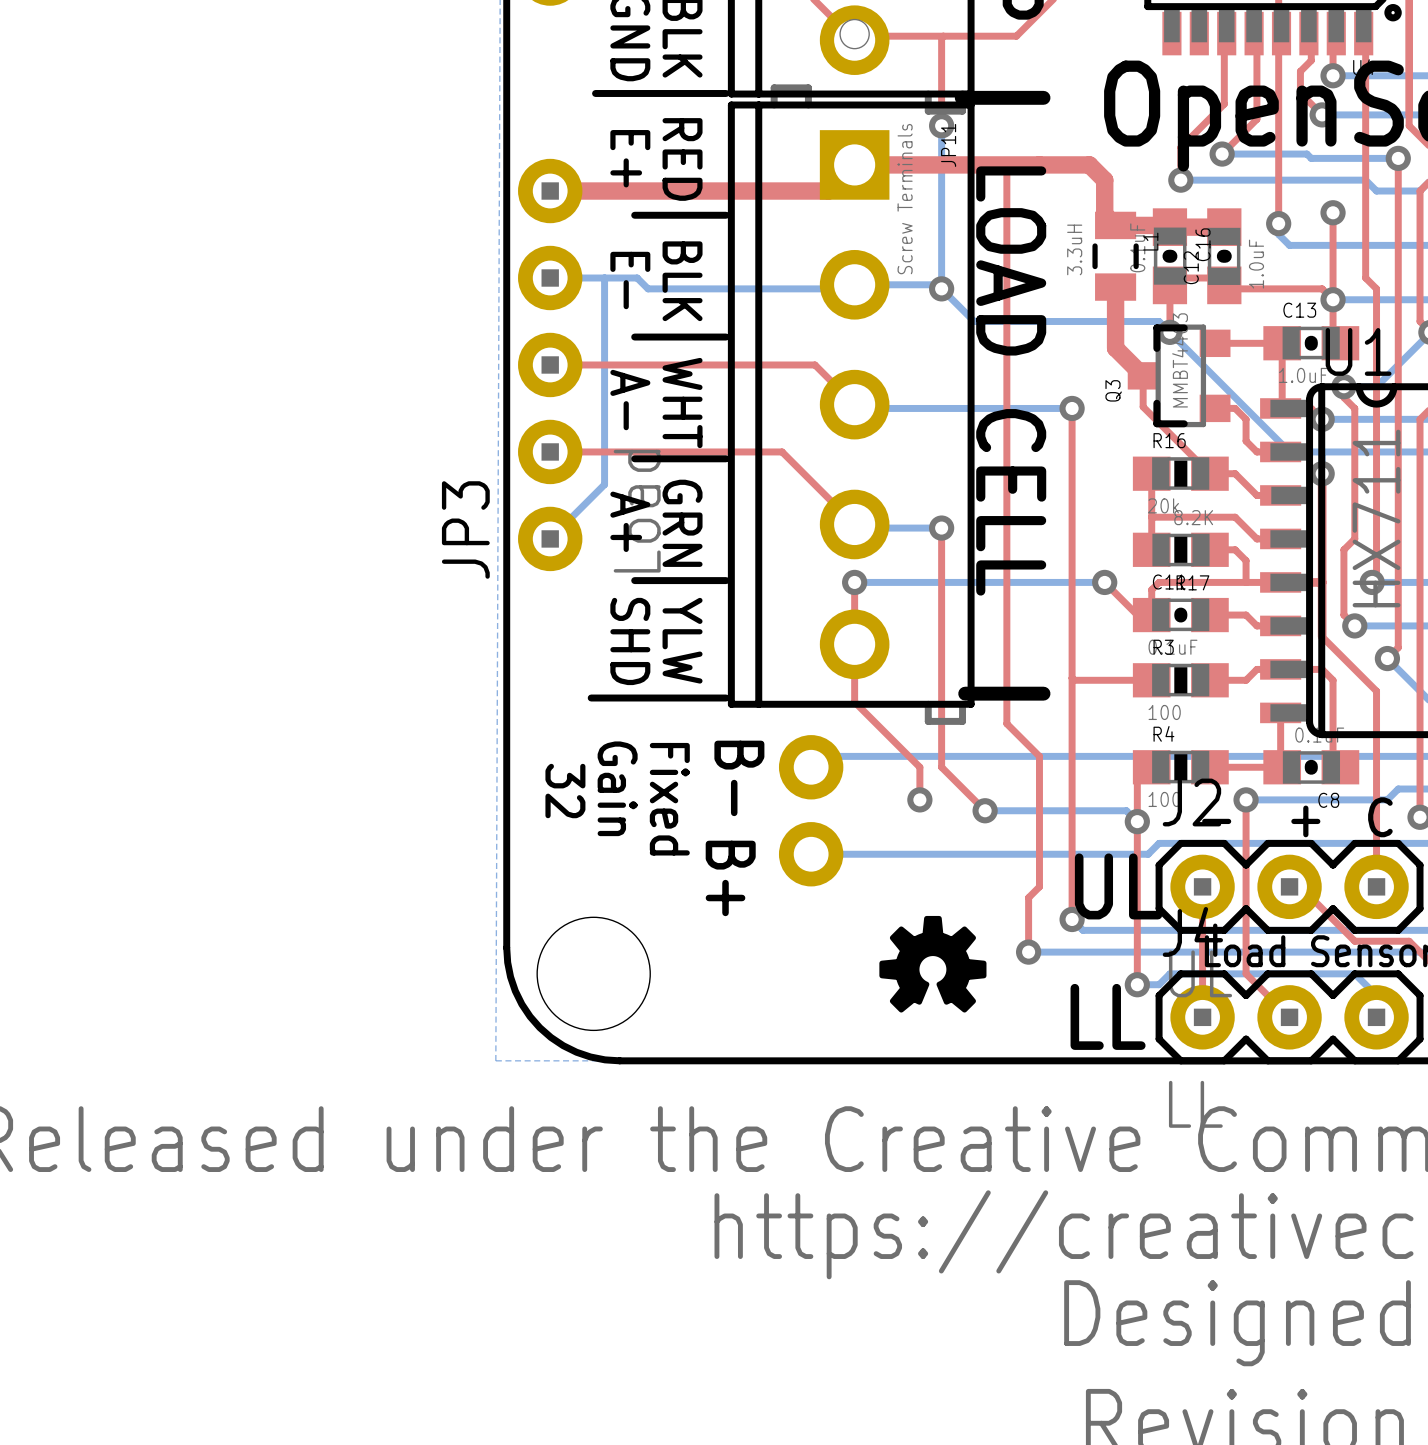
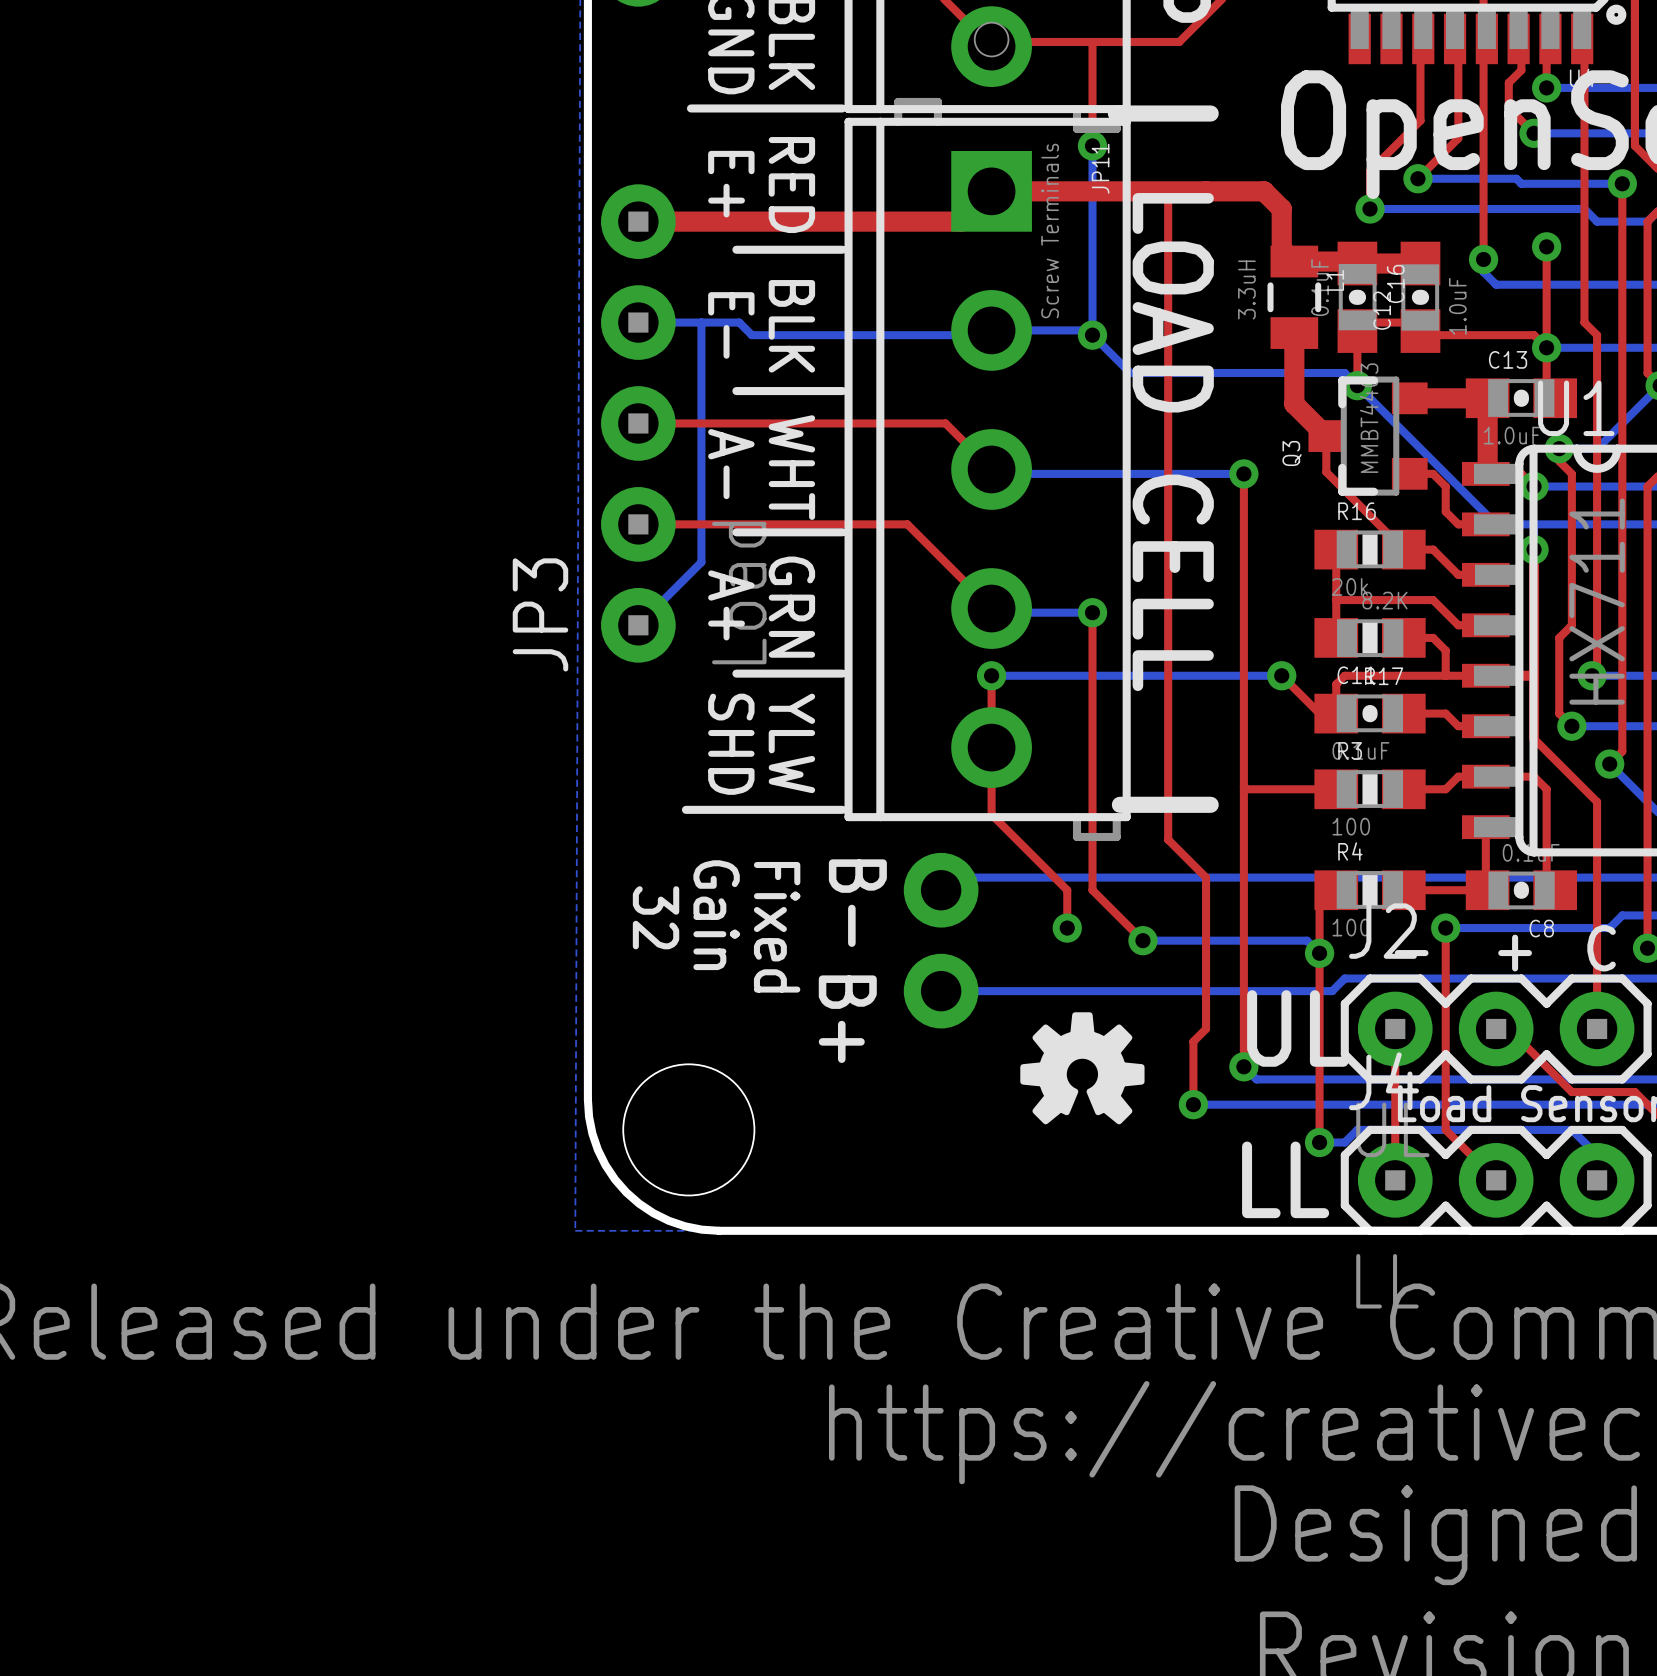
top track width: thin (1215, 343) (1282, 343) (1282, 406) -> thick (1409, 398) (1487, 398) (1487, 472)
drawing position: (932, 964) -> (1082, 1068)

